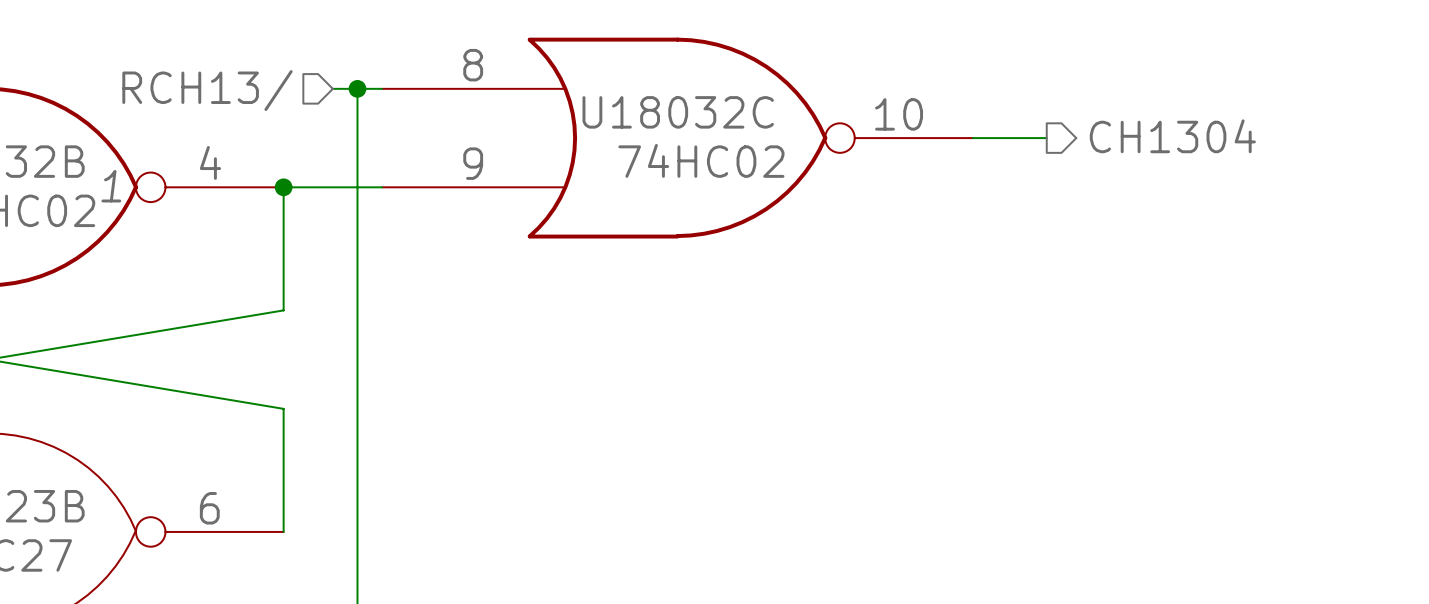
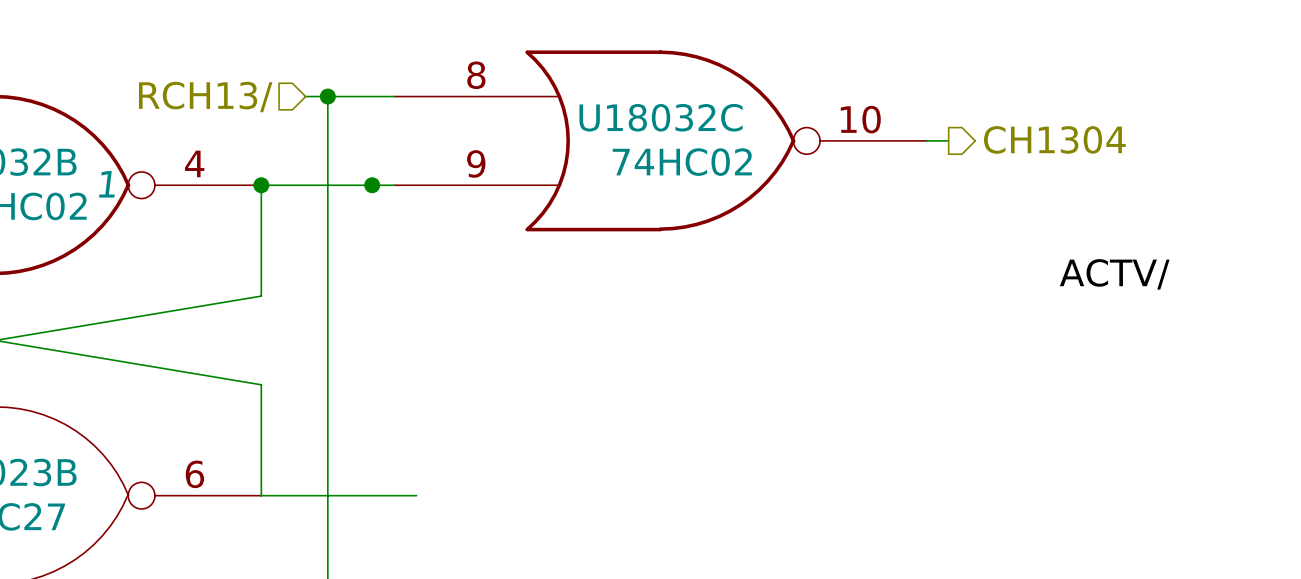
U18032C position: (677, 138) -> (660, 140)
junction: none -> (372, 185)
label: none -> ACTV/ (1114, 274)
wire: none -> (261, 495) (416, 495)

